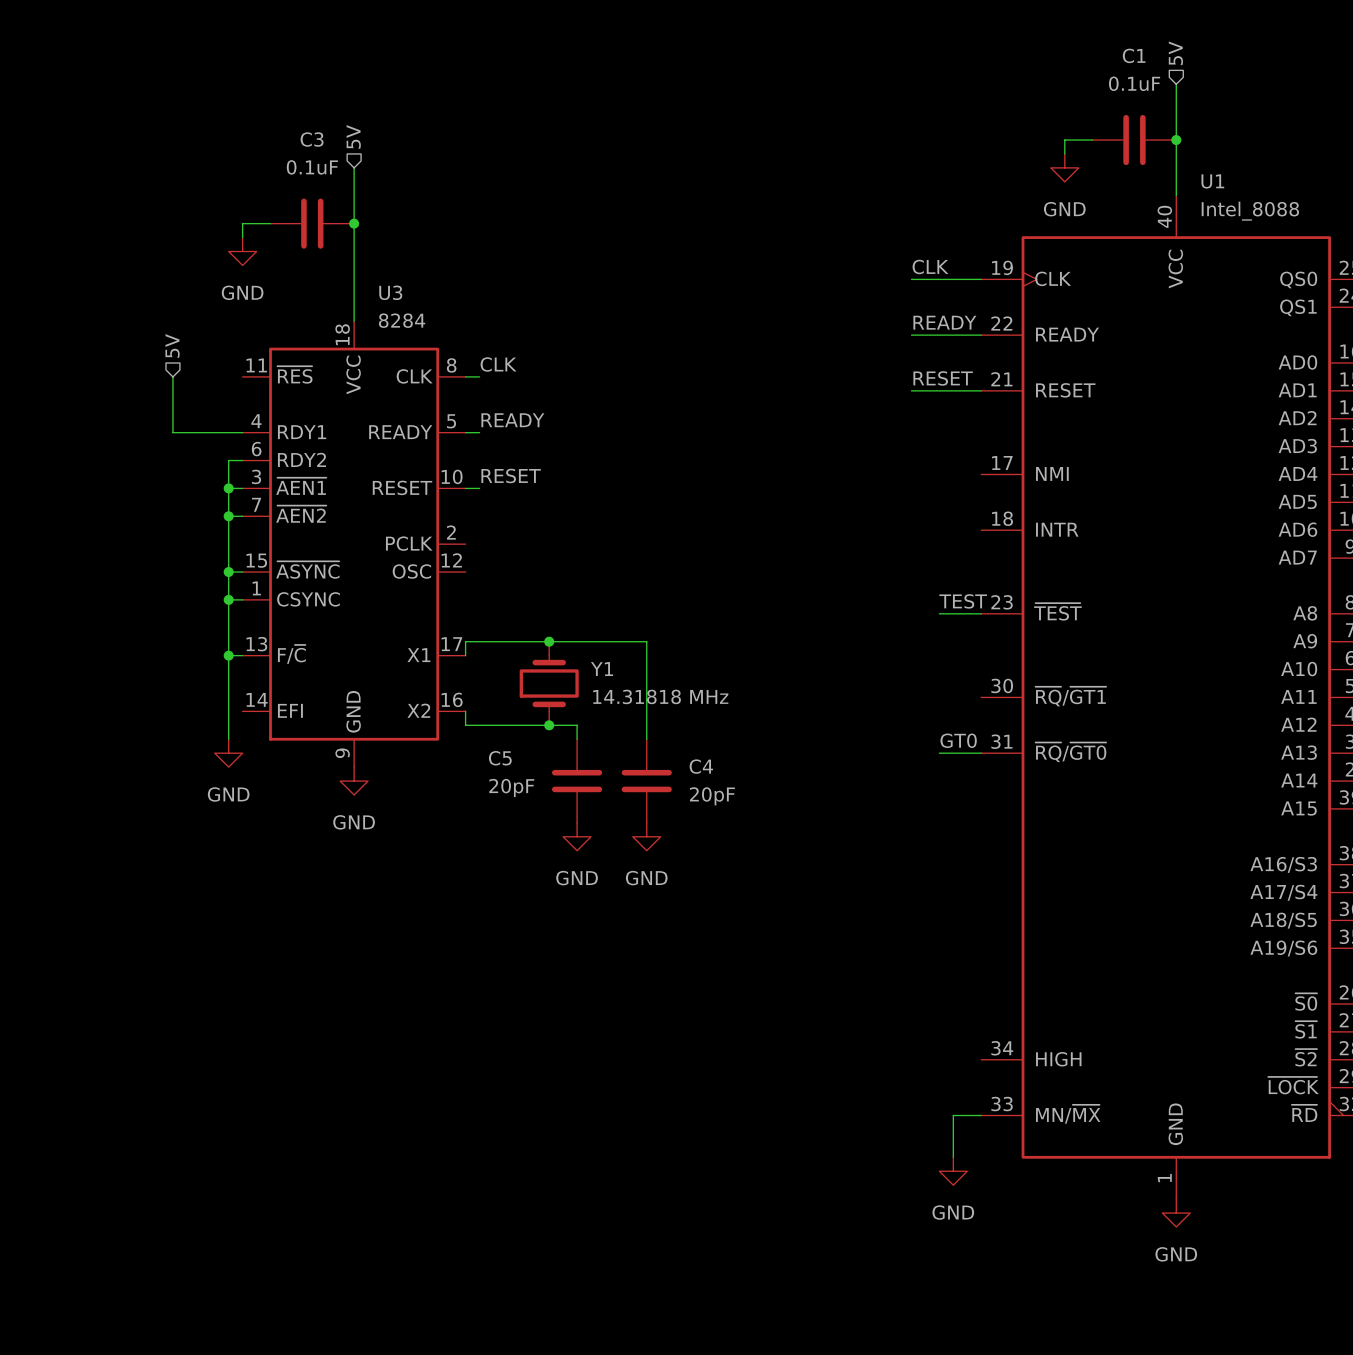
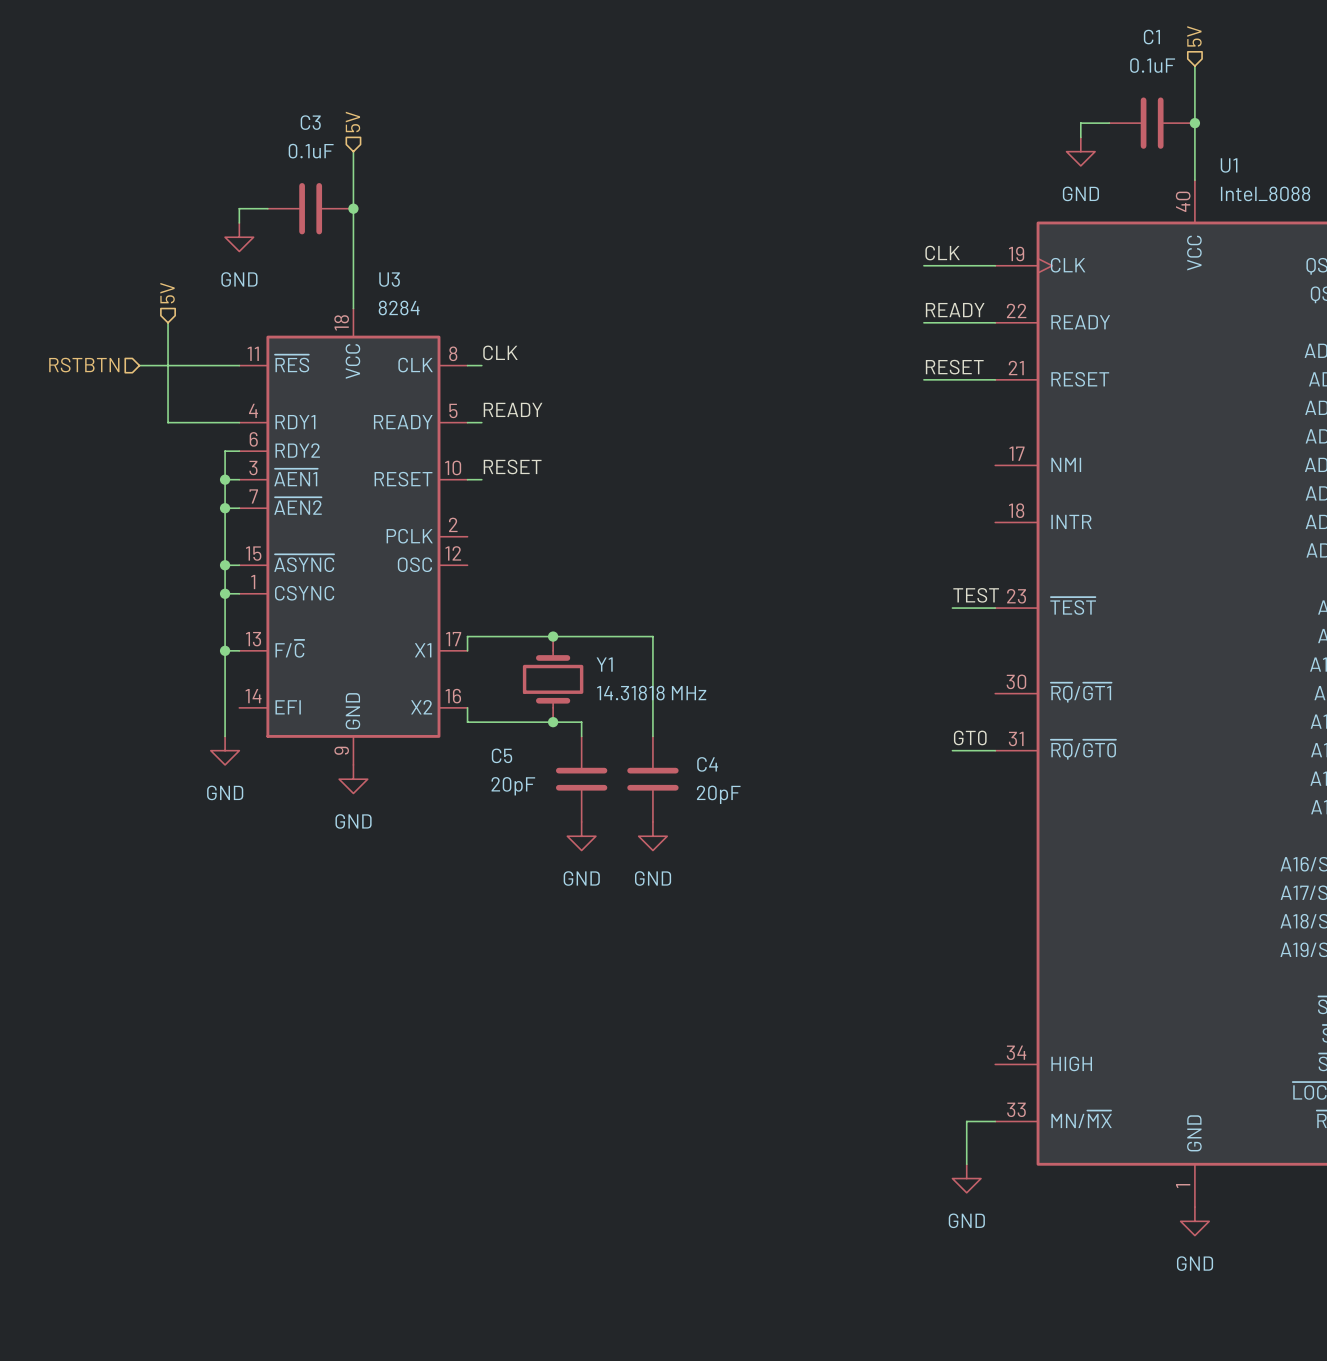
wire: none -> (168, 322) (168, 365)
hierarchical label position: 5V (172, 345) -> 5V (167, 293)
hierarchical label: none -> RSTBTN (84, 365)
wire: none -> (139, 365) (239, 365)

